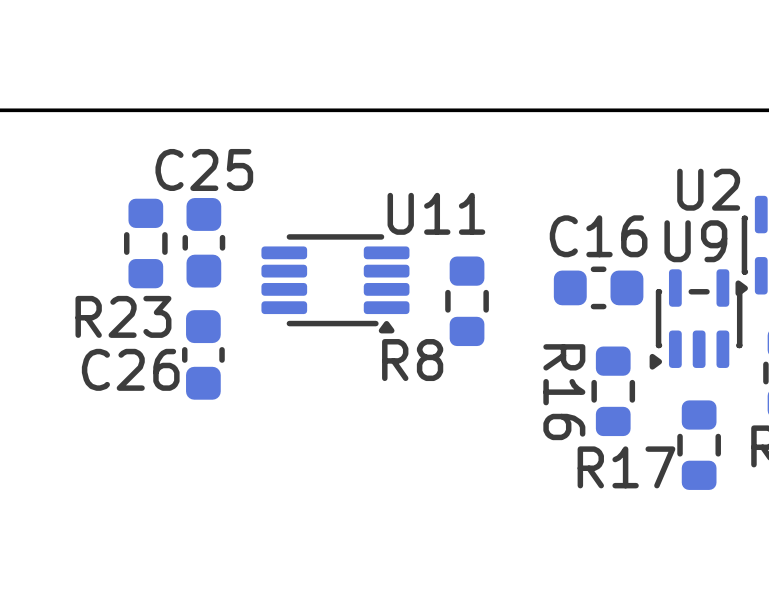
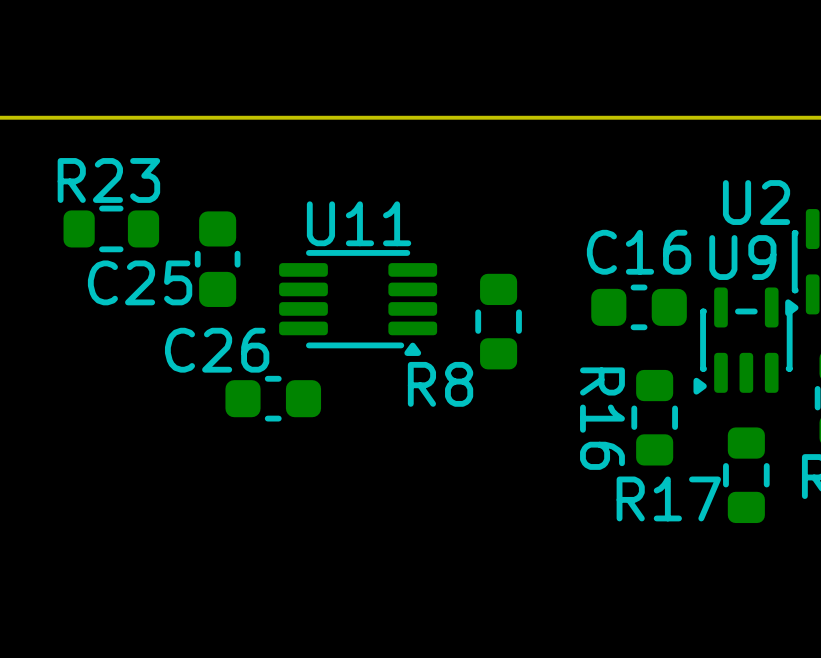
C25 name position: C25 (204, 169) -> C25 (140, 282)
U11 name position: U11 (436, 213) -> U11 (359, 223)
R23 rotation: 0° (145, 243) -> 90° clockwise (111, 228)
R23 name position: R23 (123, 316) -> R23 (108, 180)
C26 rotation: 0° (203, 354) -> 90° clockwise (273, 398)
C26 position: (203, 354) -> (273, 398)

